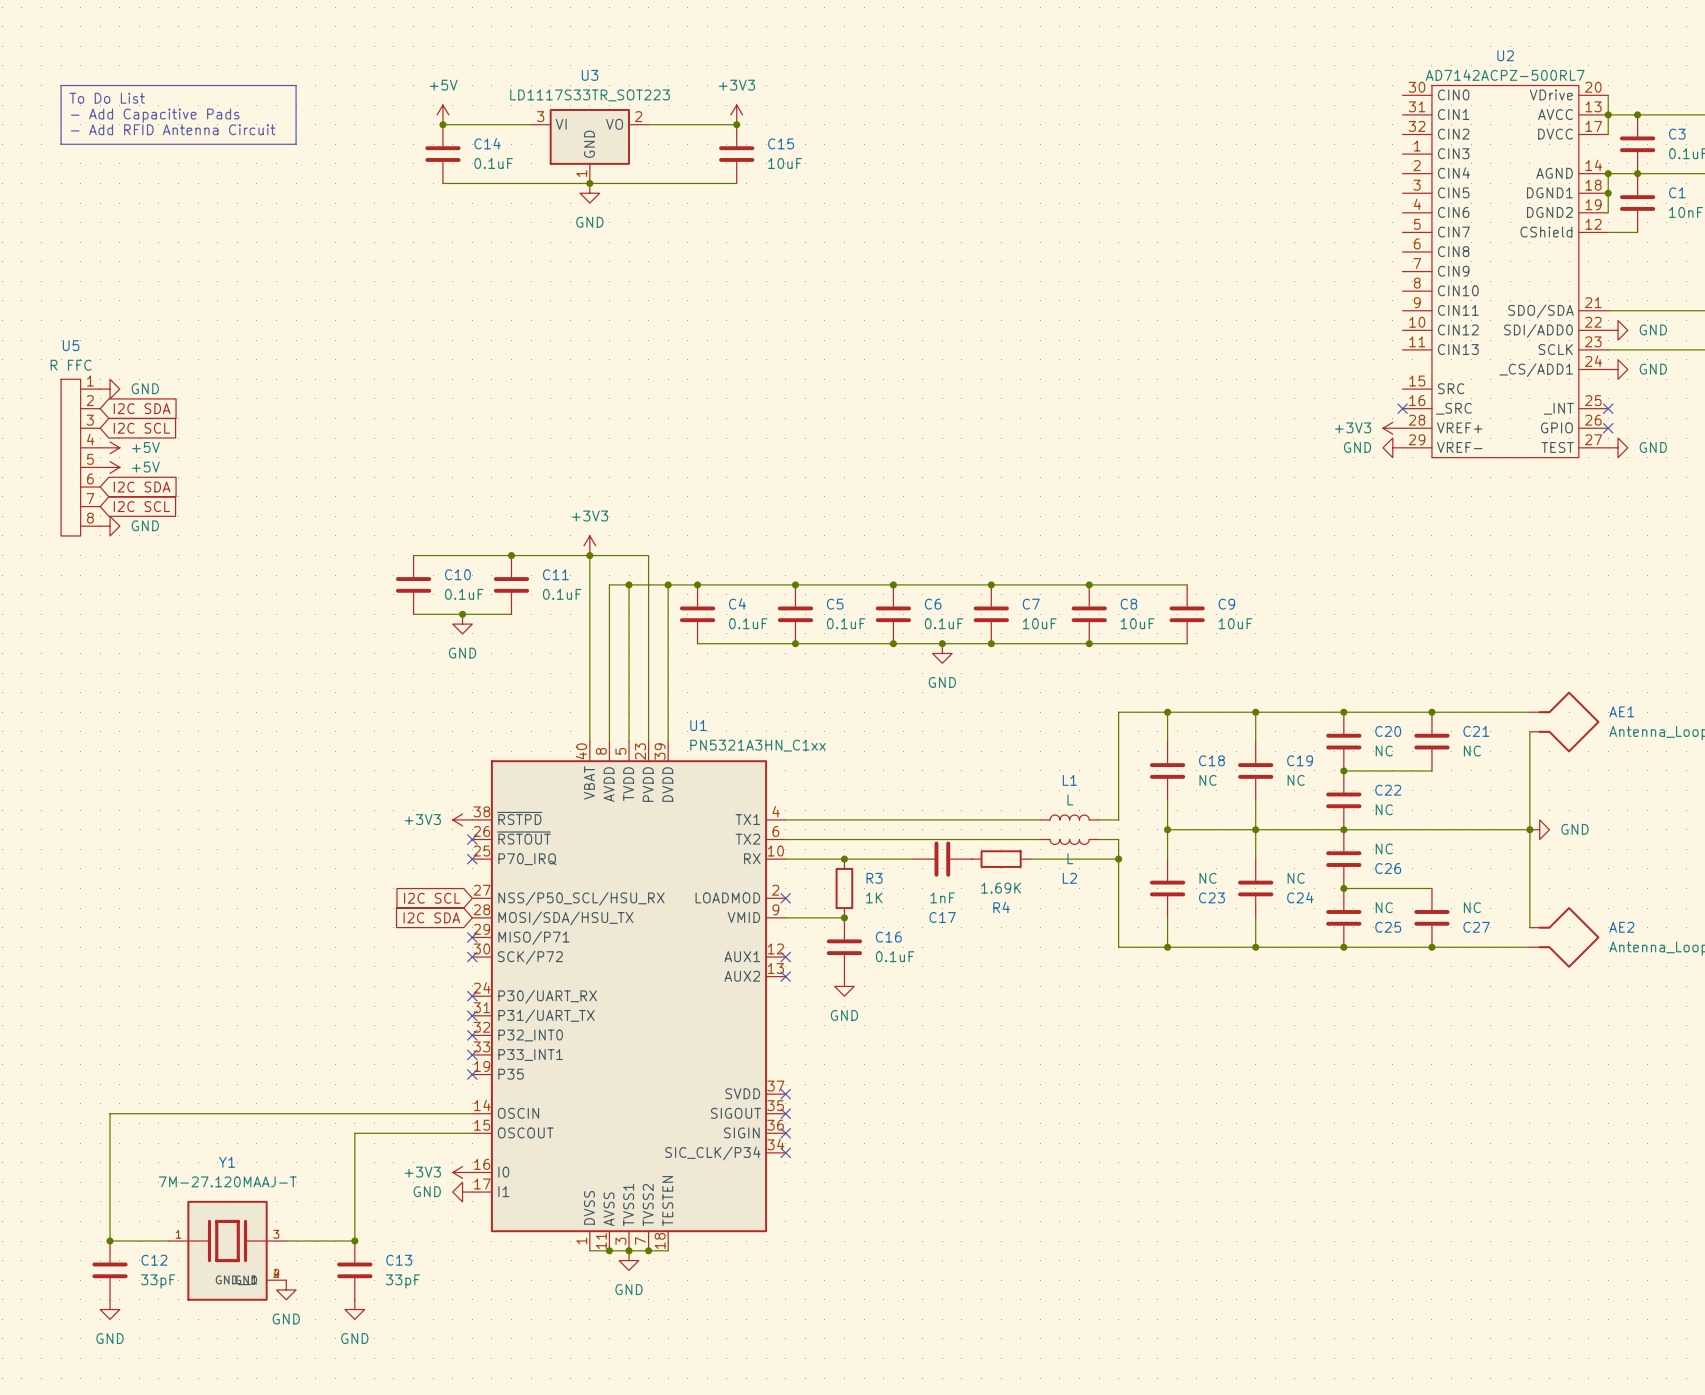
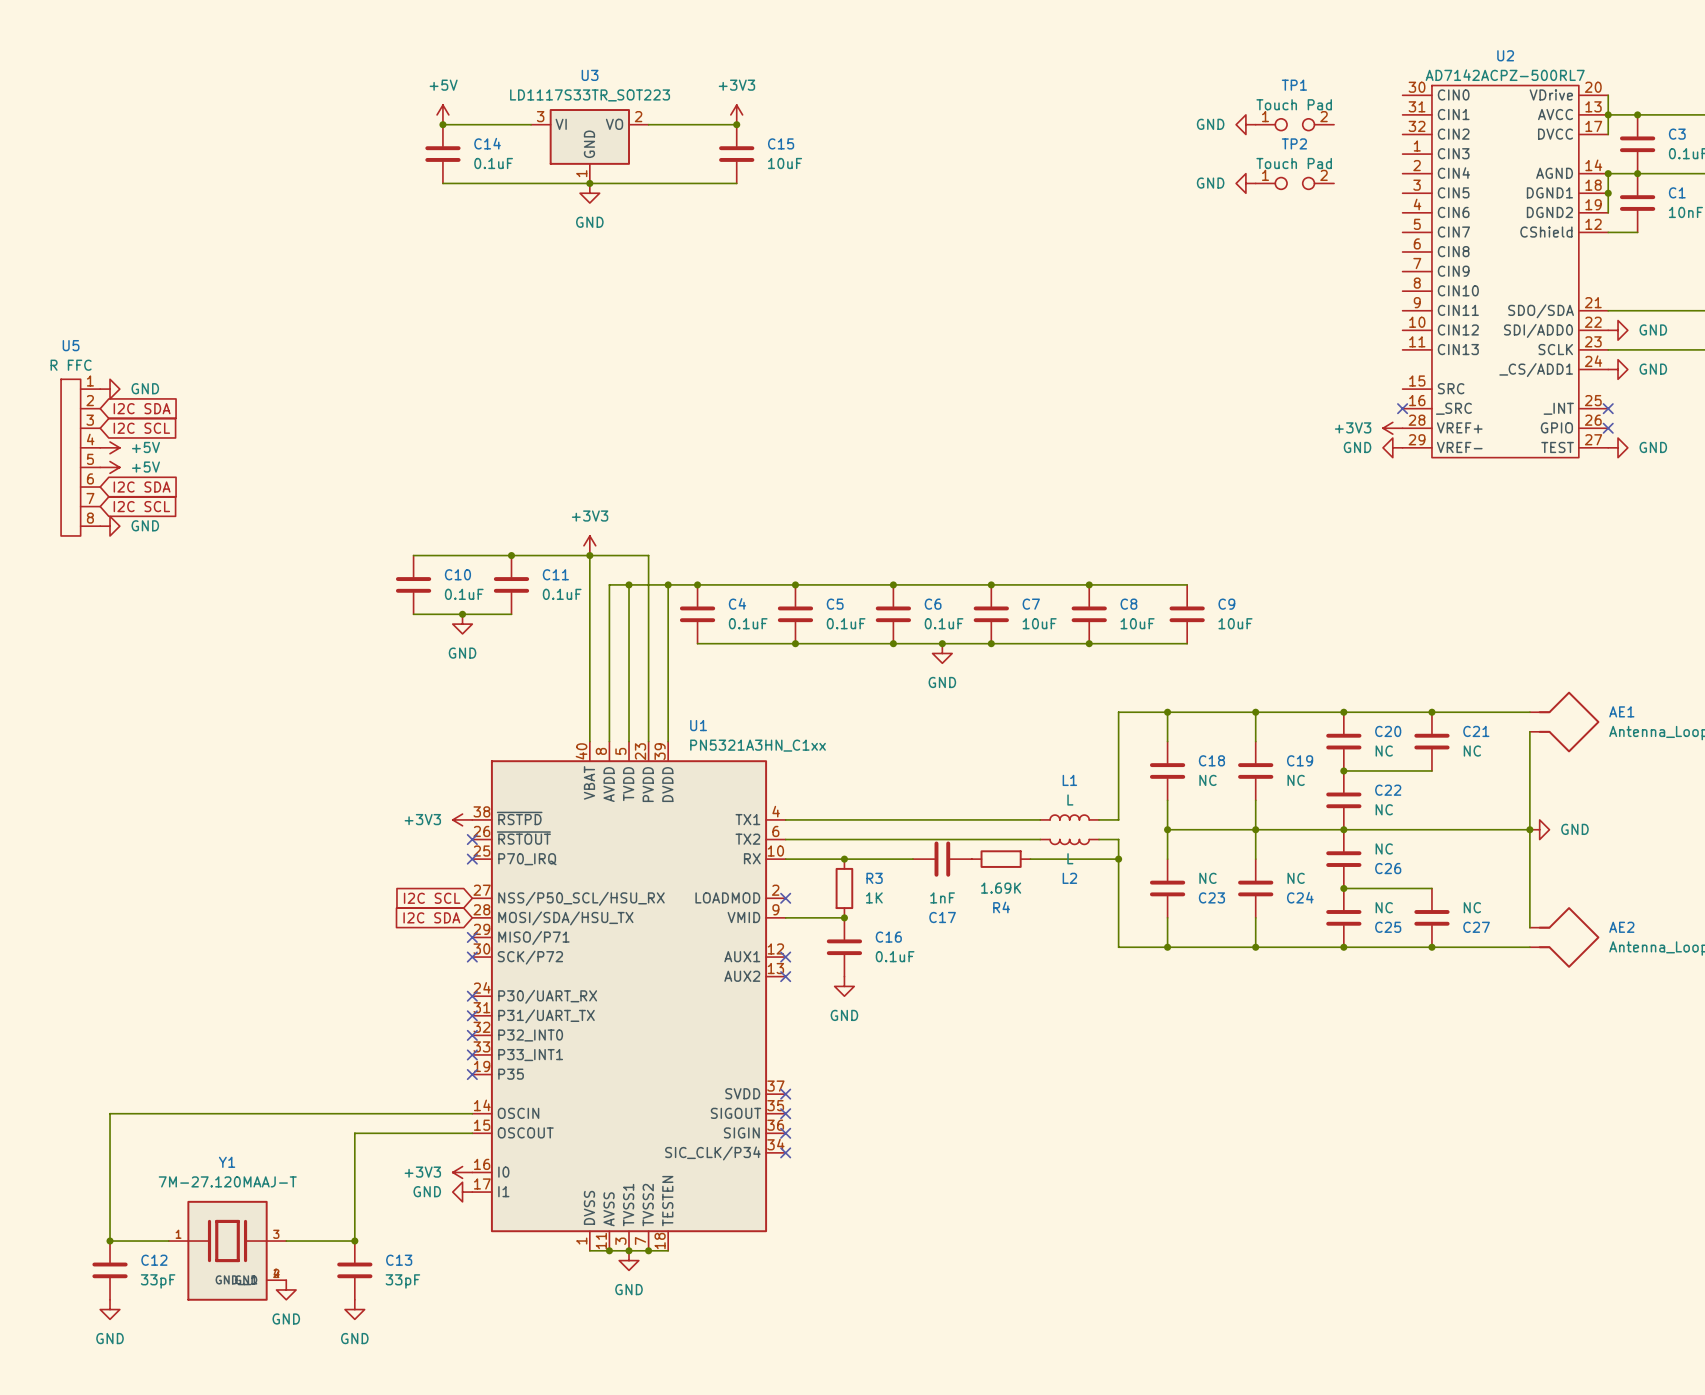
line: (61, 85) (296, 85) (296, 144) (61, 144) (61, 85) -> none
text: To Do List (107, 98) -> none
text: - Add Capacitive Pads (155, 115) -> none
power symbol: none -> GND (1245, 124)
TP1: none -> Touch Pad (1294, 124)
text: - Add RFID Antenna Circuit (173, 129) -> none
power symbol: none -> GND (1245, 183)
TP2: none -> Touch Pad (1294, 183)

